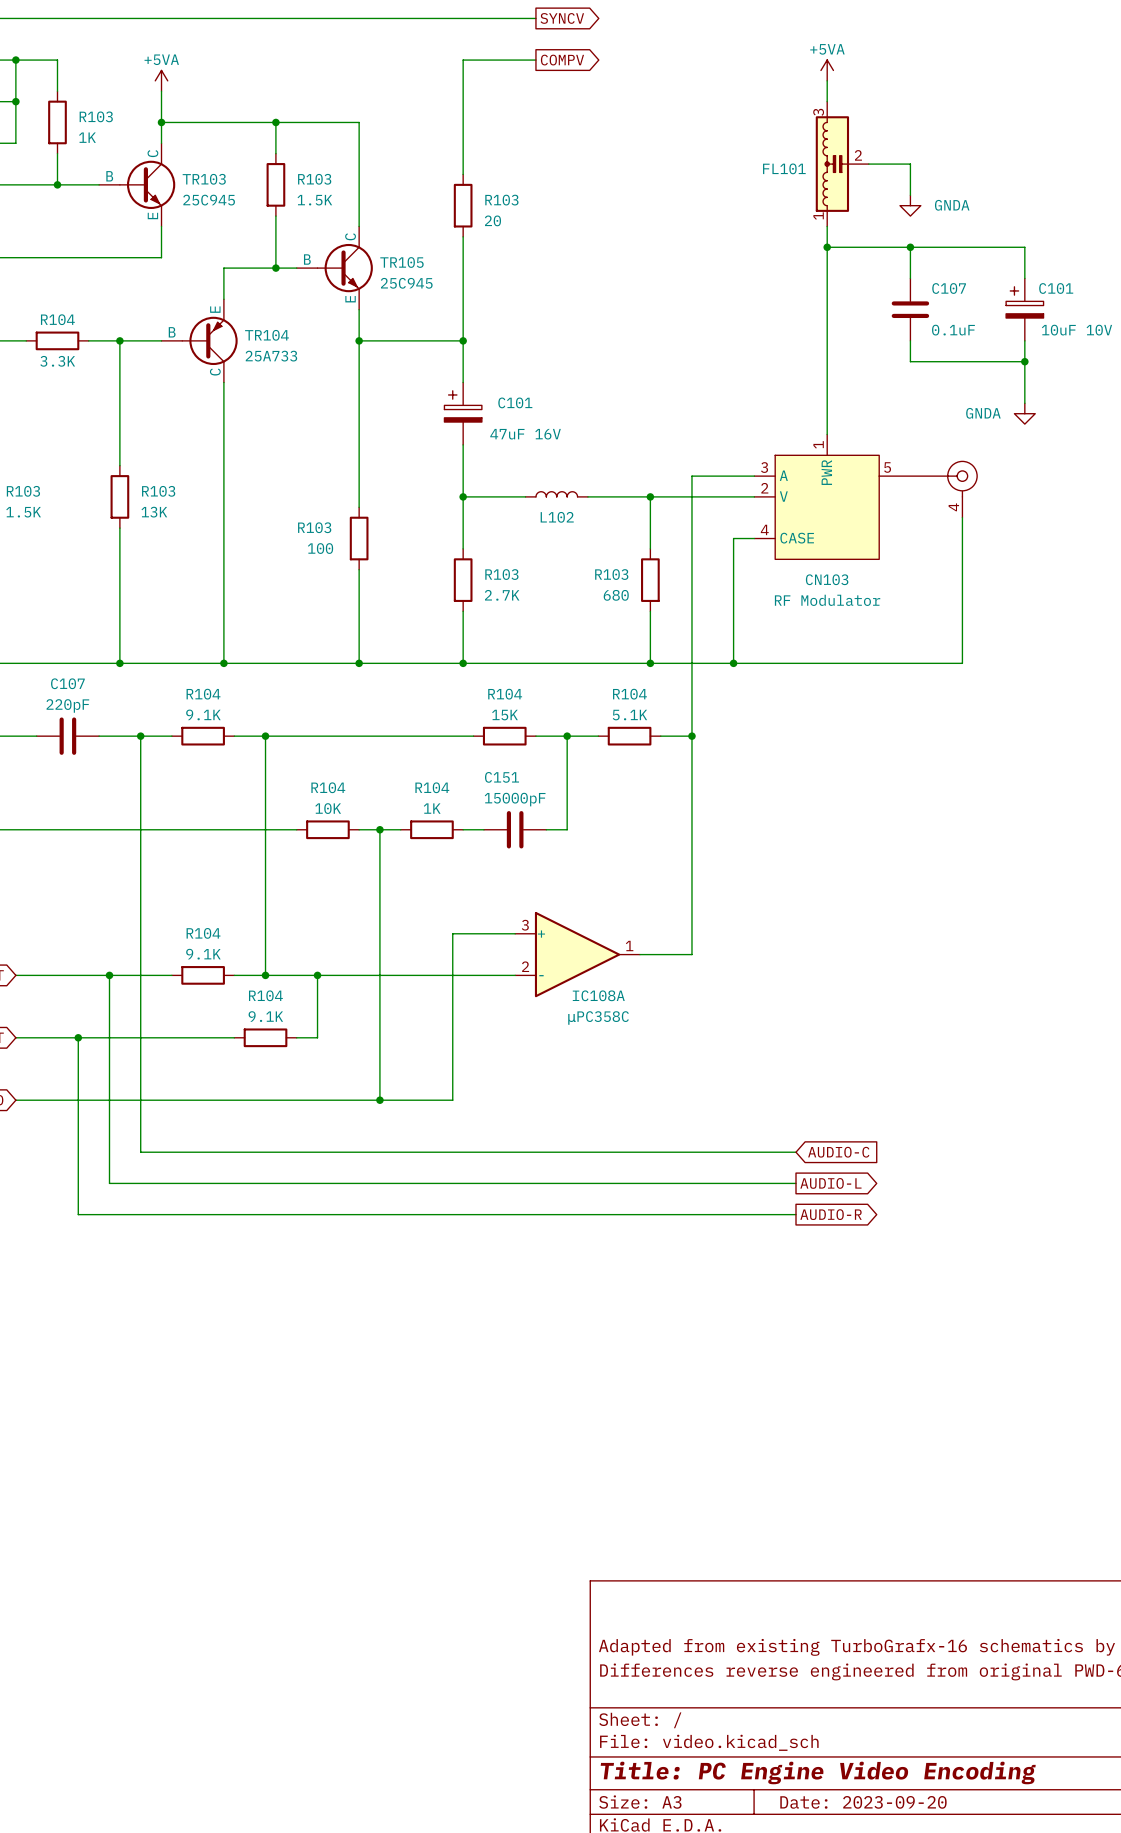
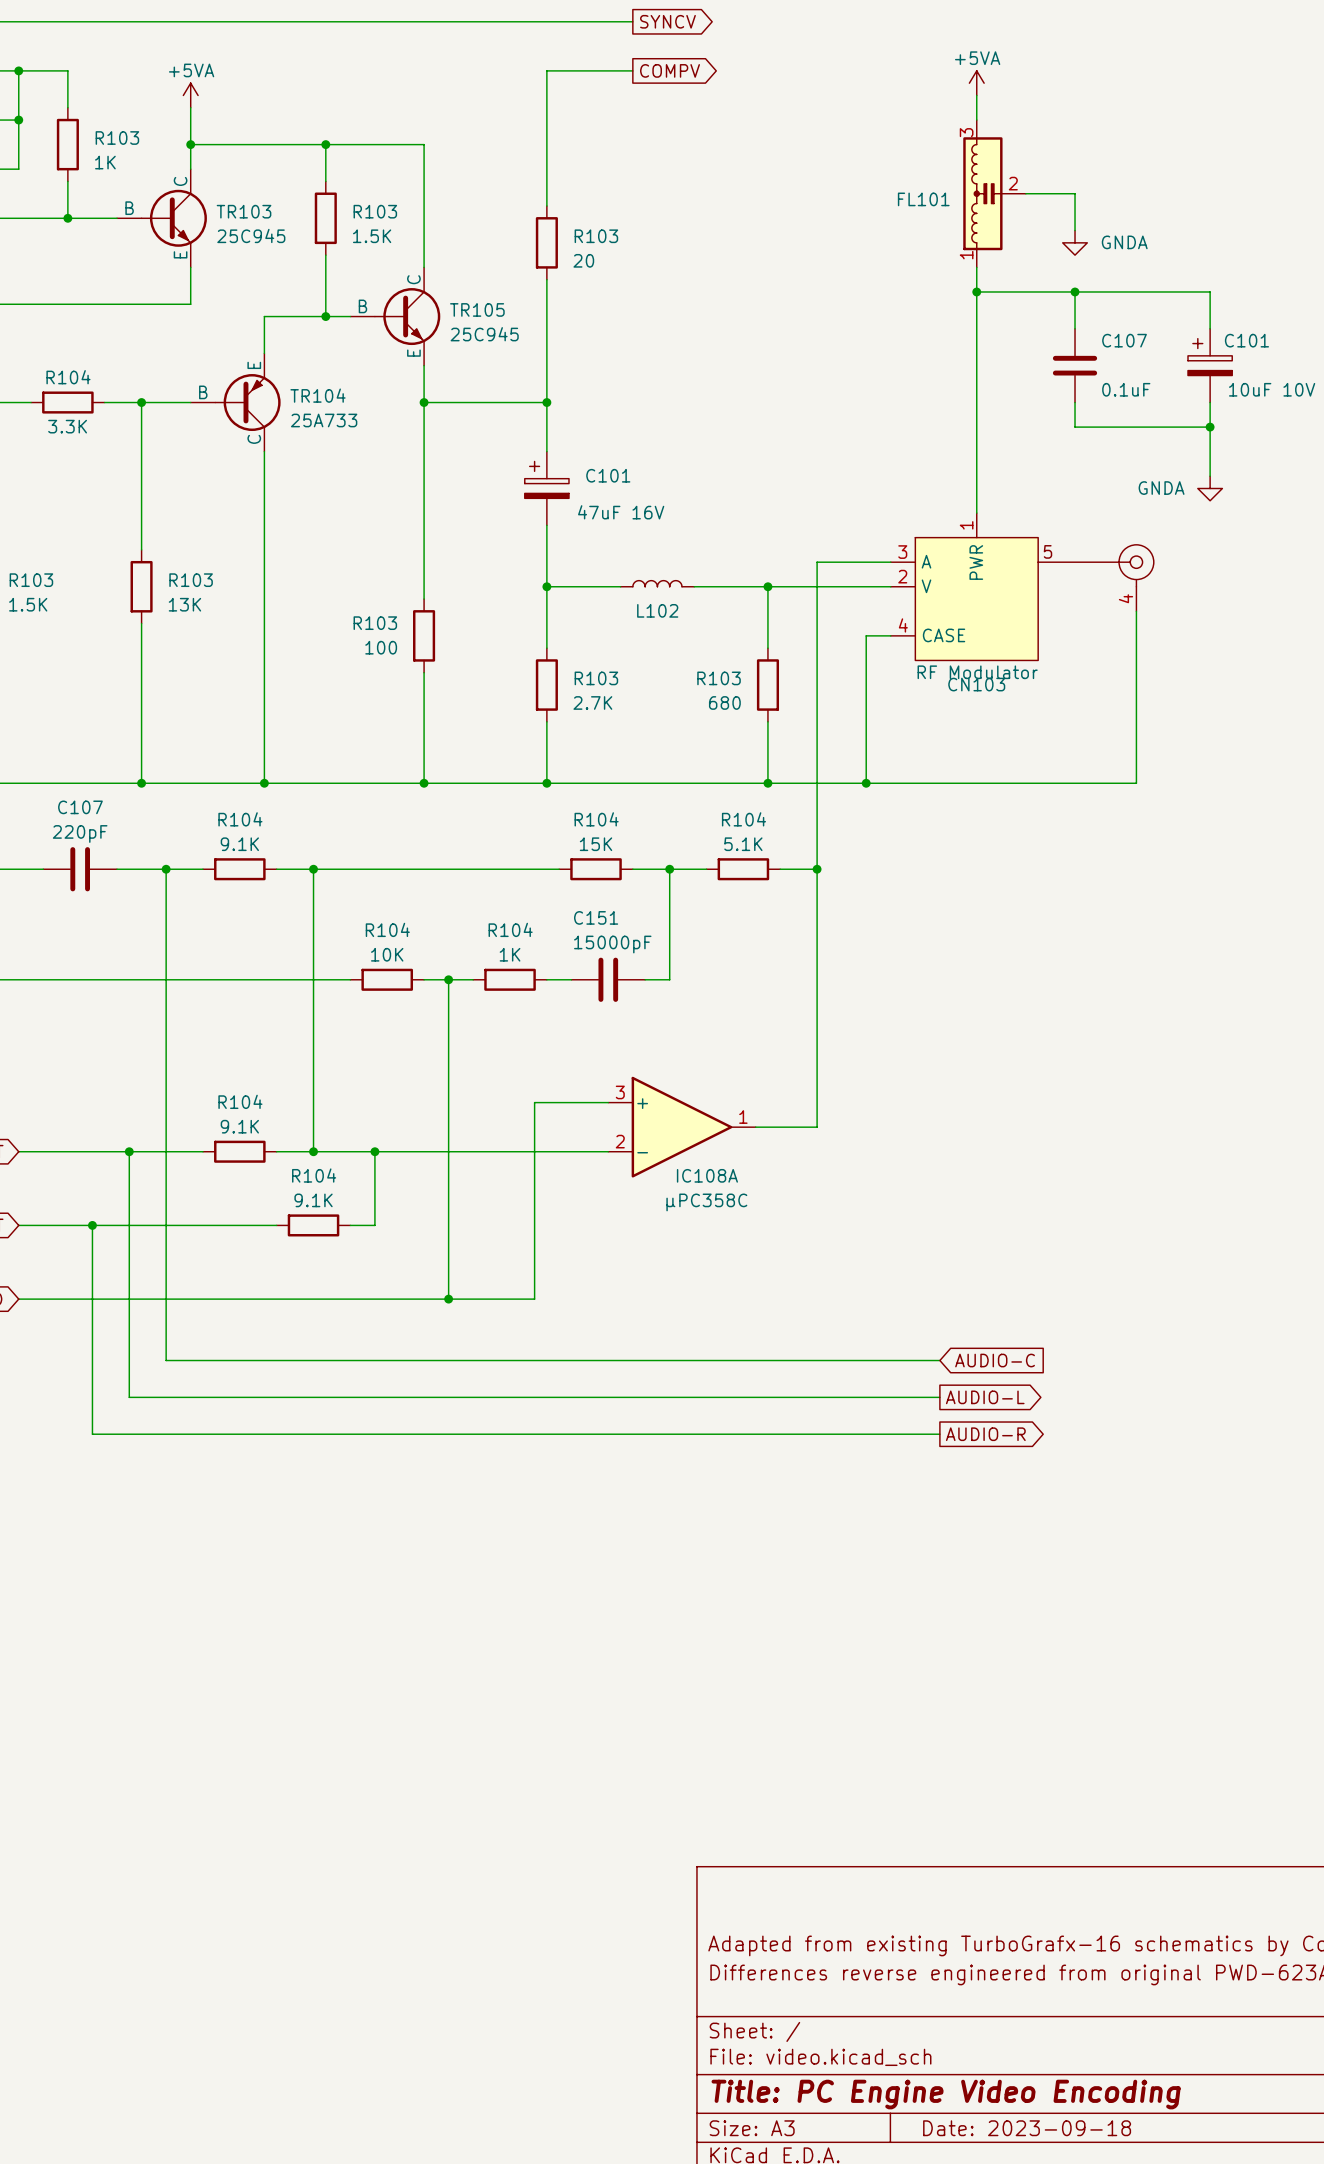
CN103 value position: RF Modulator (827, 600) -> RF Modulator (977, 672)
title block: Date: 2023-09-20 (863, 1802) -> Date: 2023-09-18 (1027, 2128)

